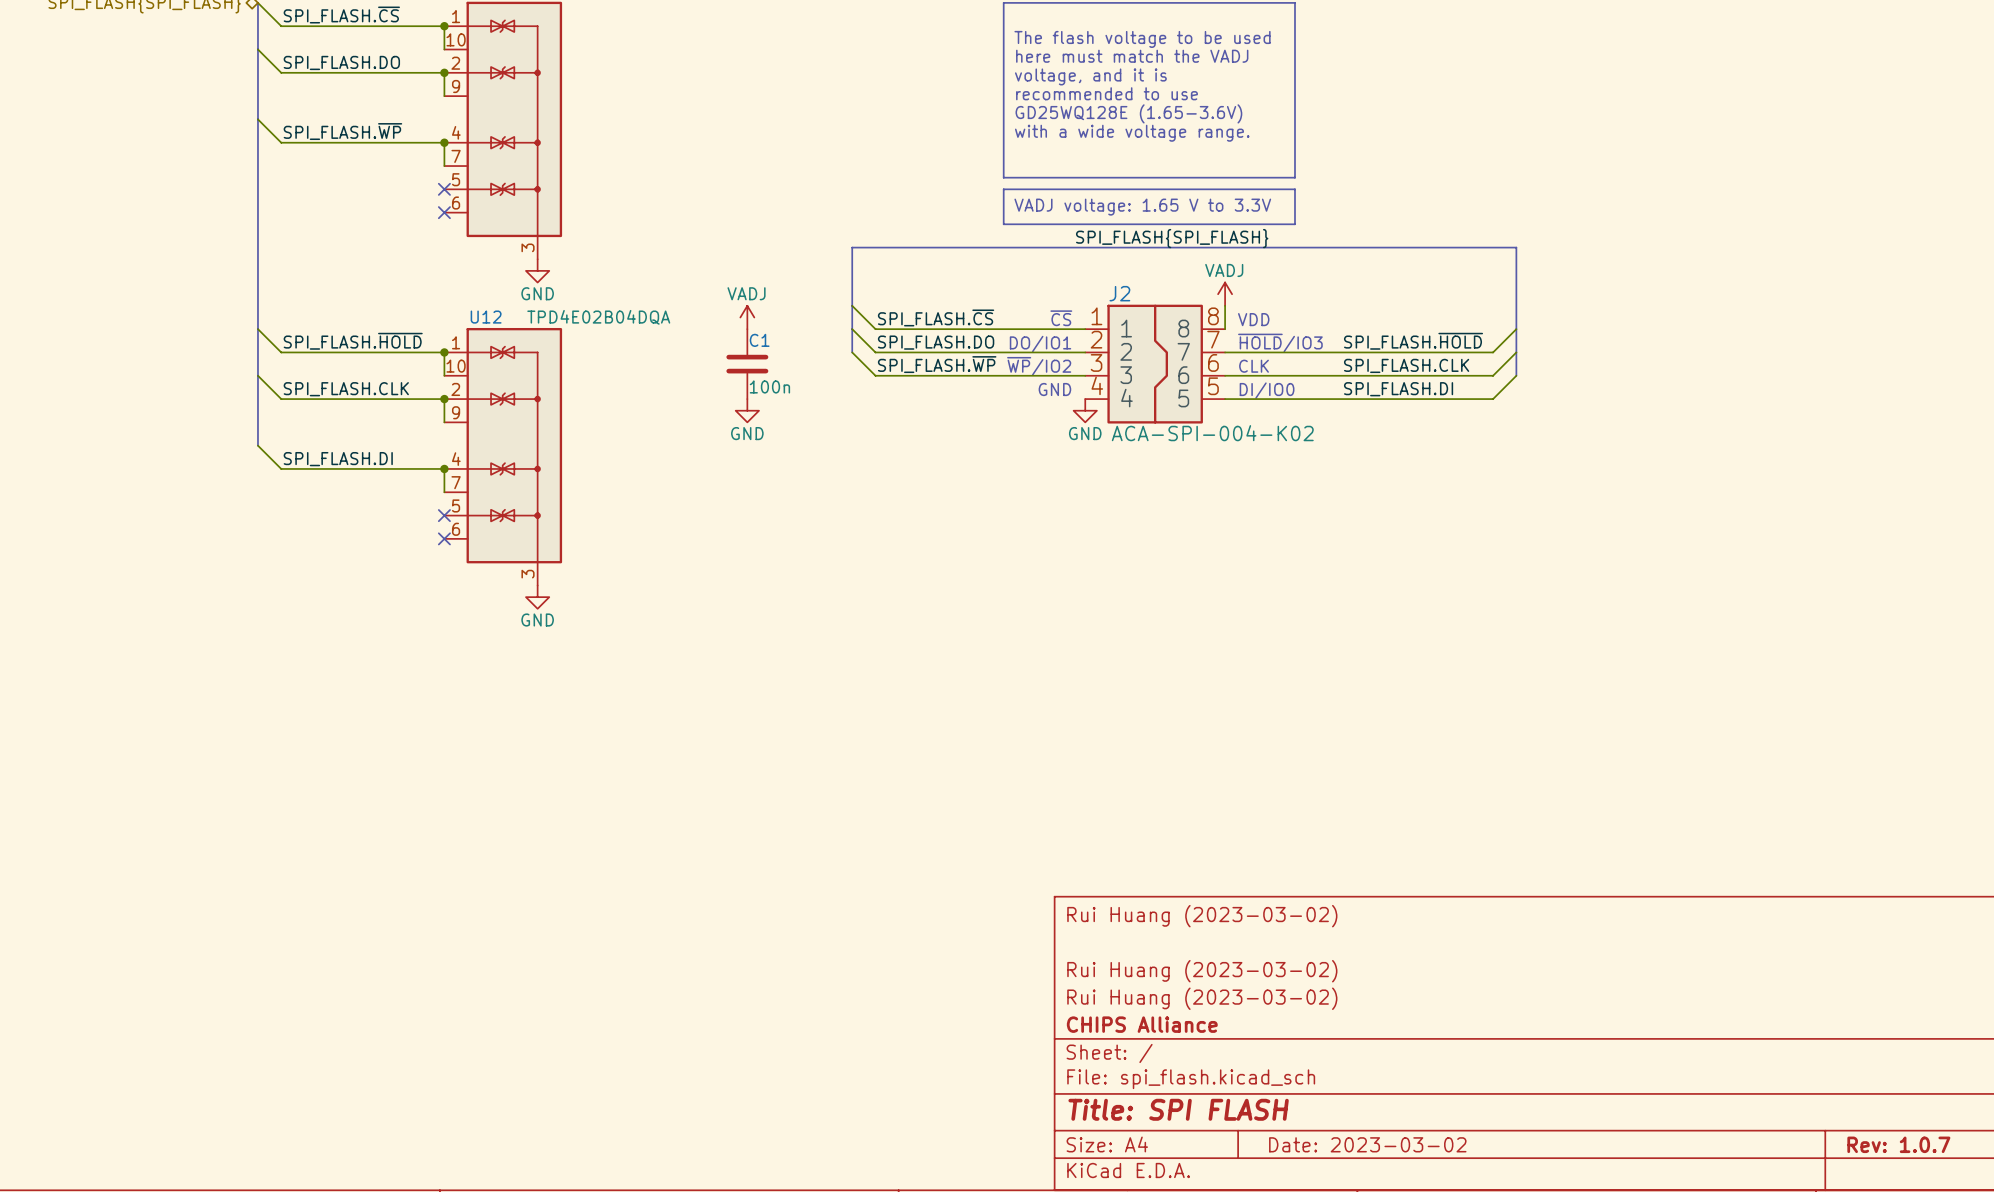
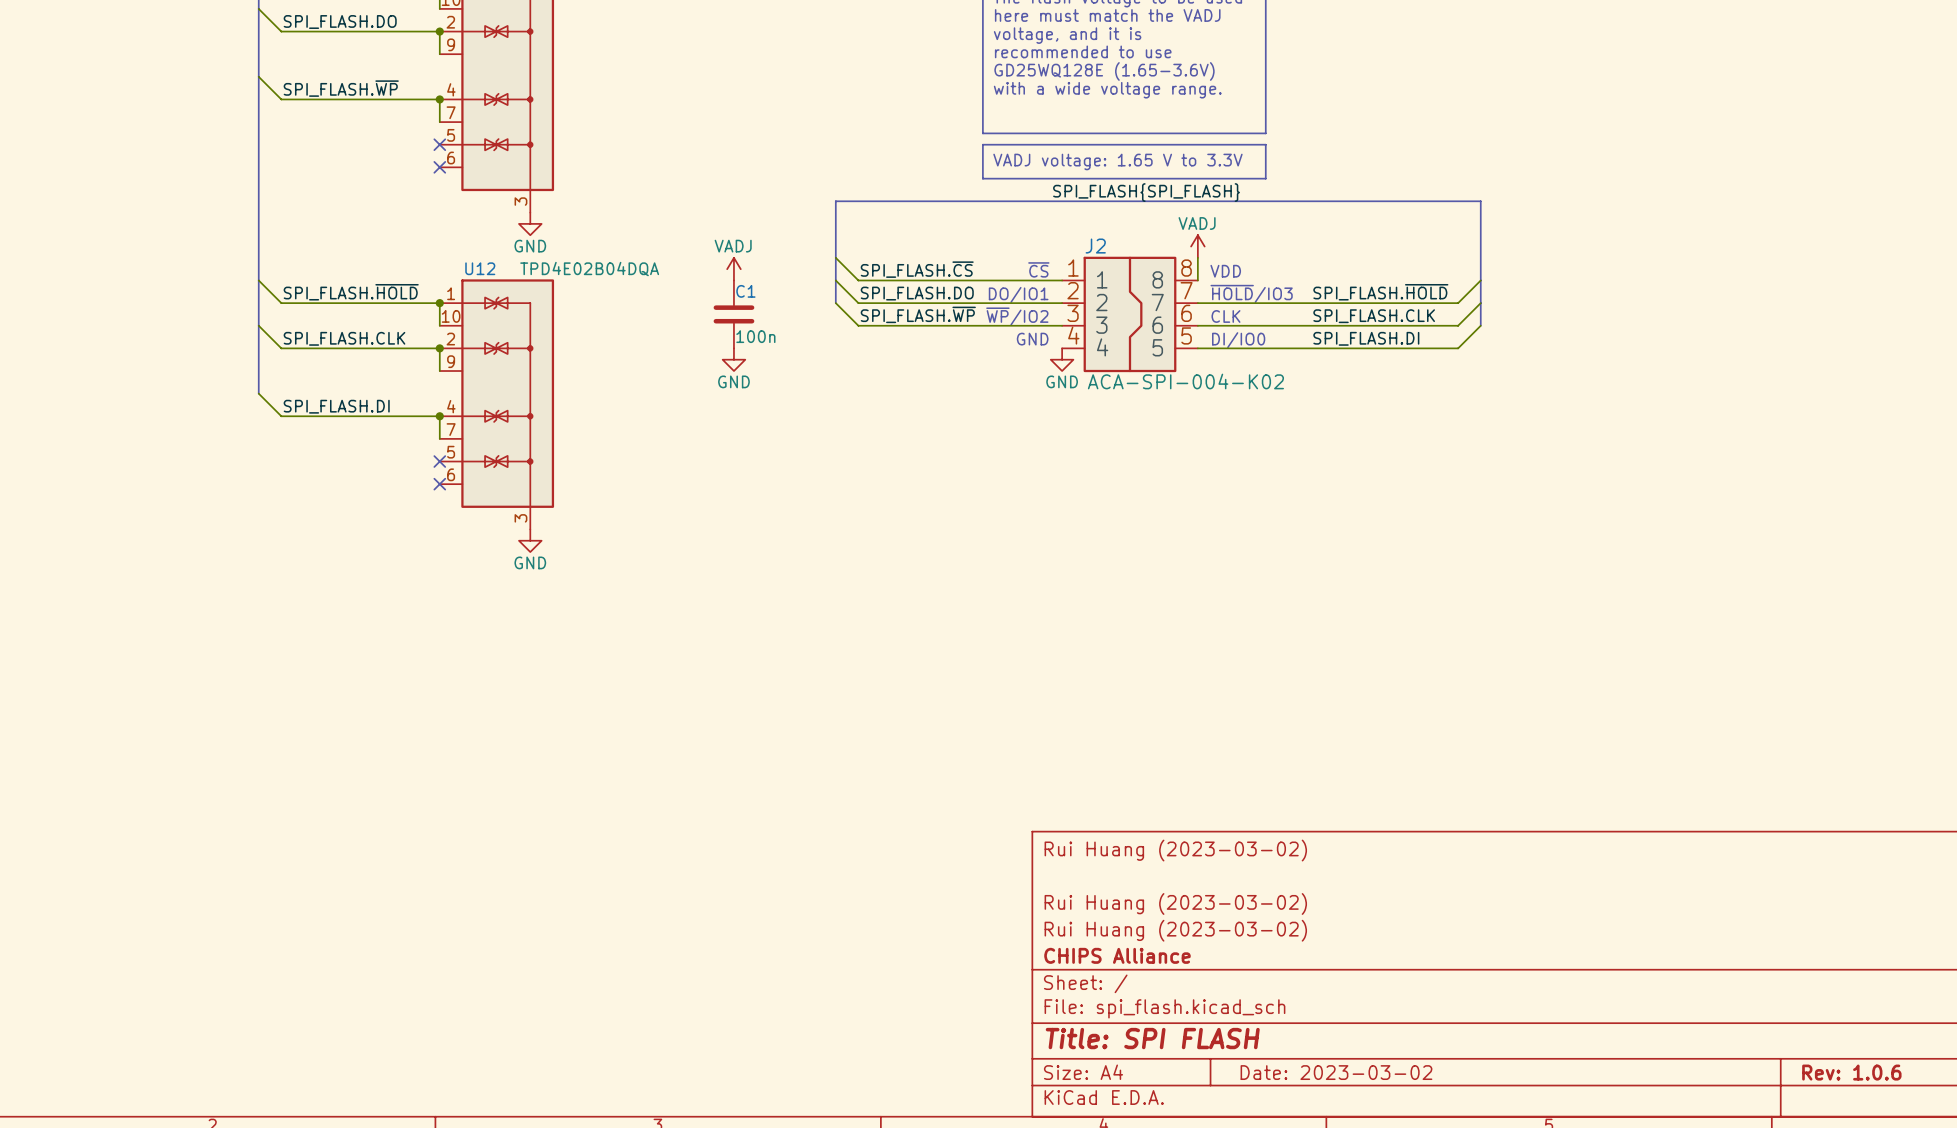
title block: Rev: 1.0.7 (1898, 1144) -> Rev: 1.0.6 (1851, 1072)

